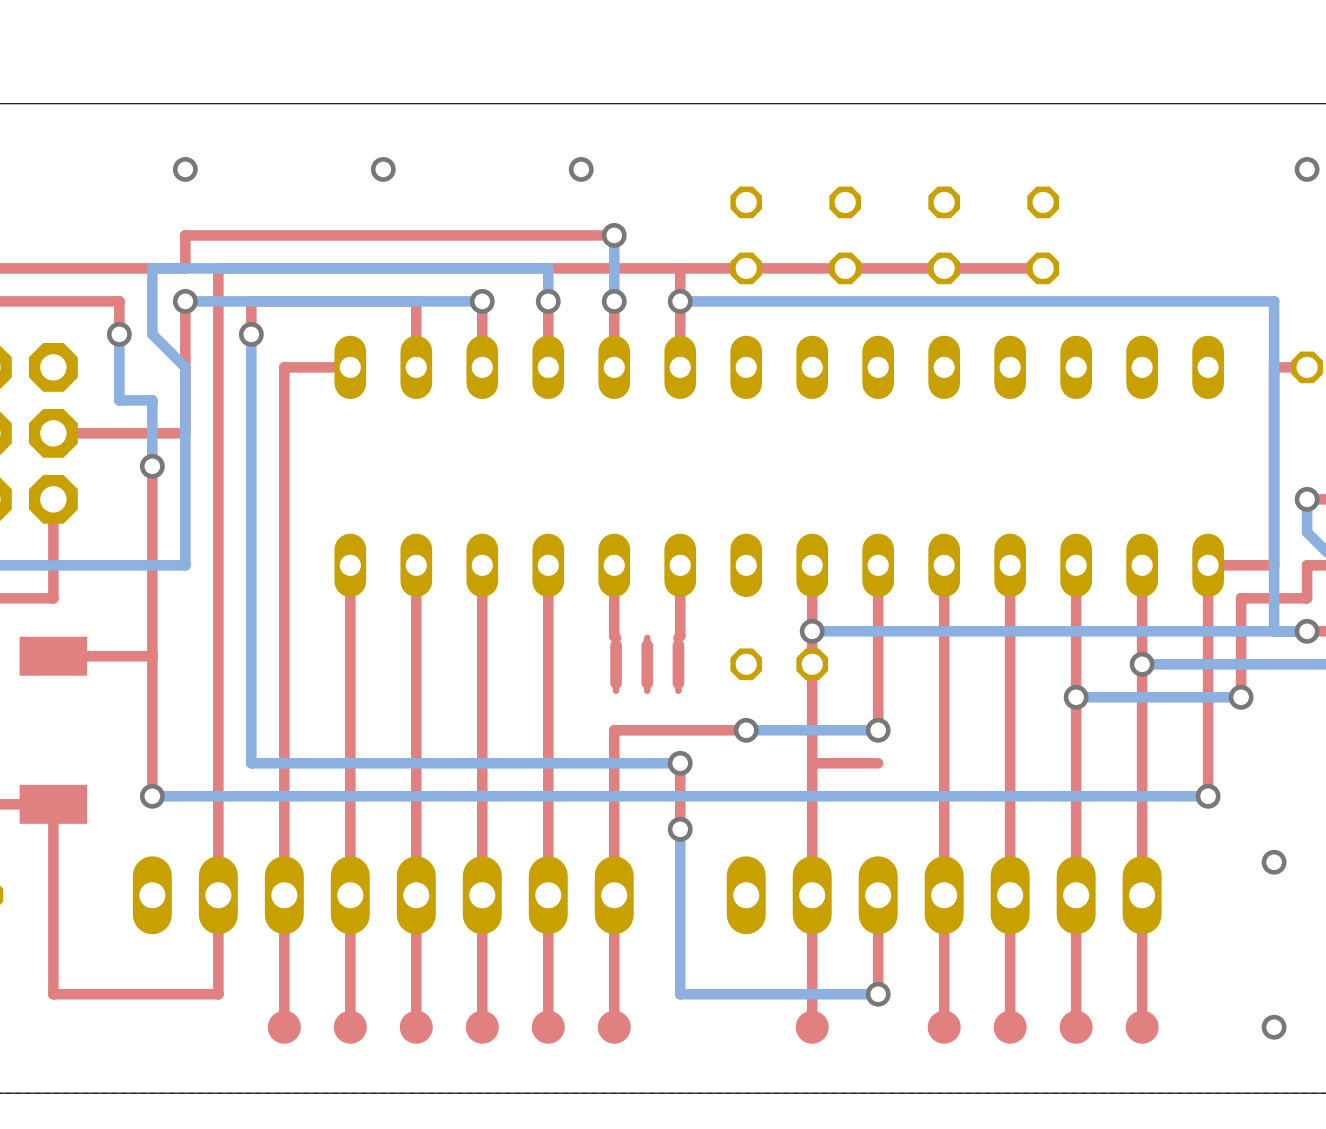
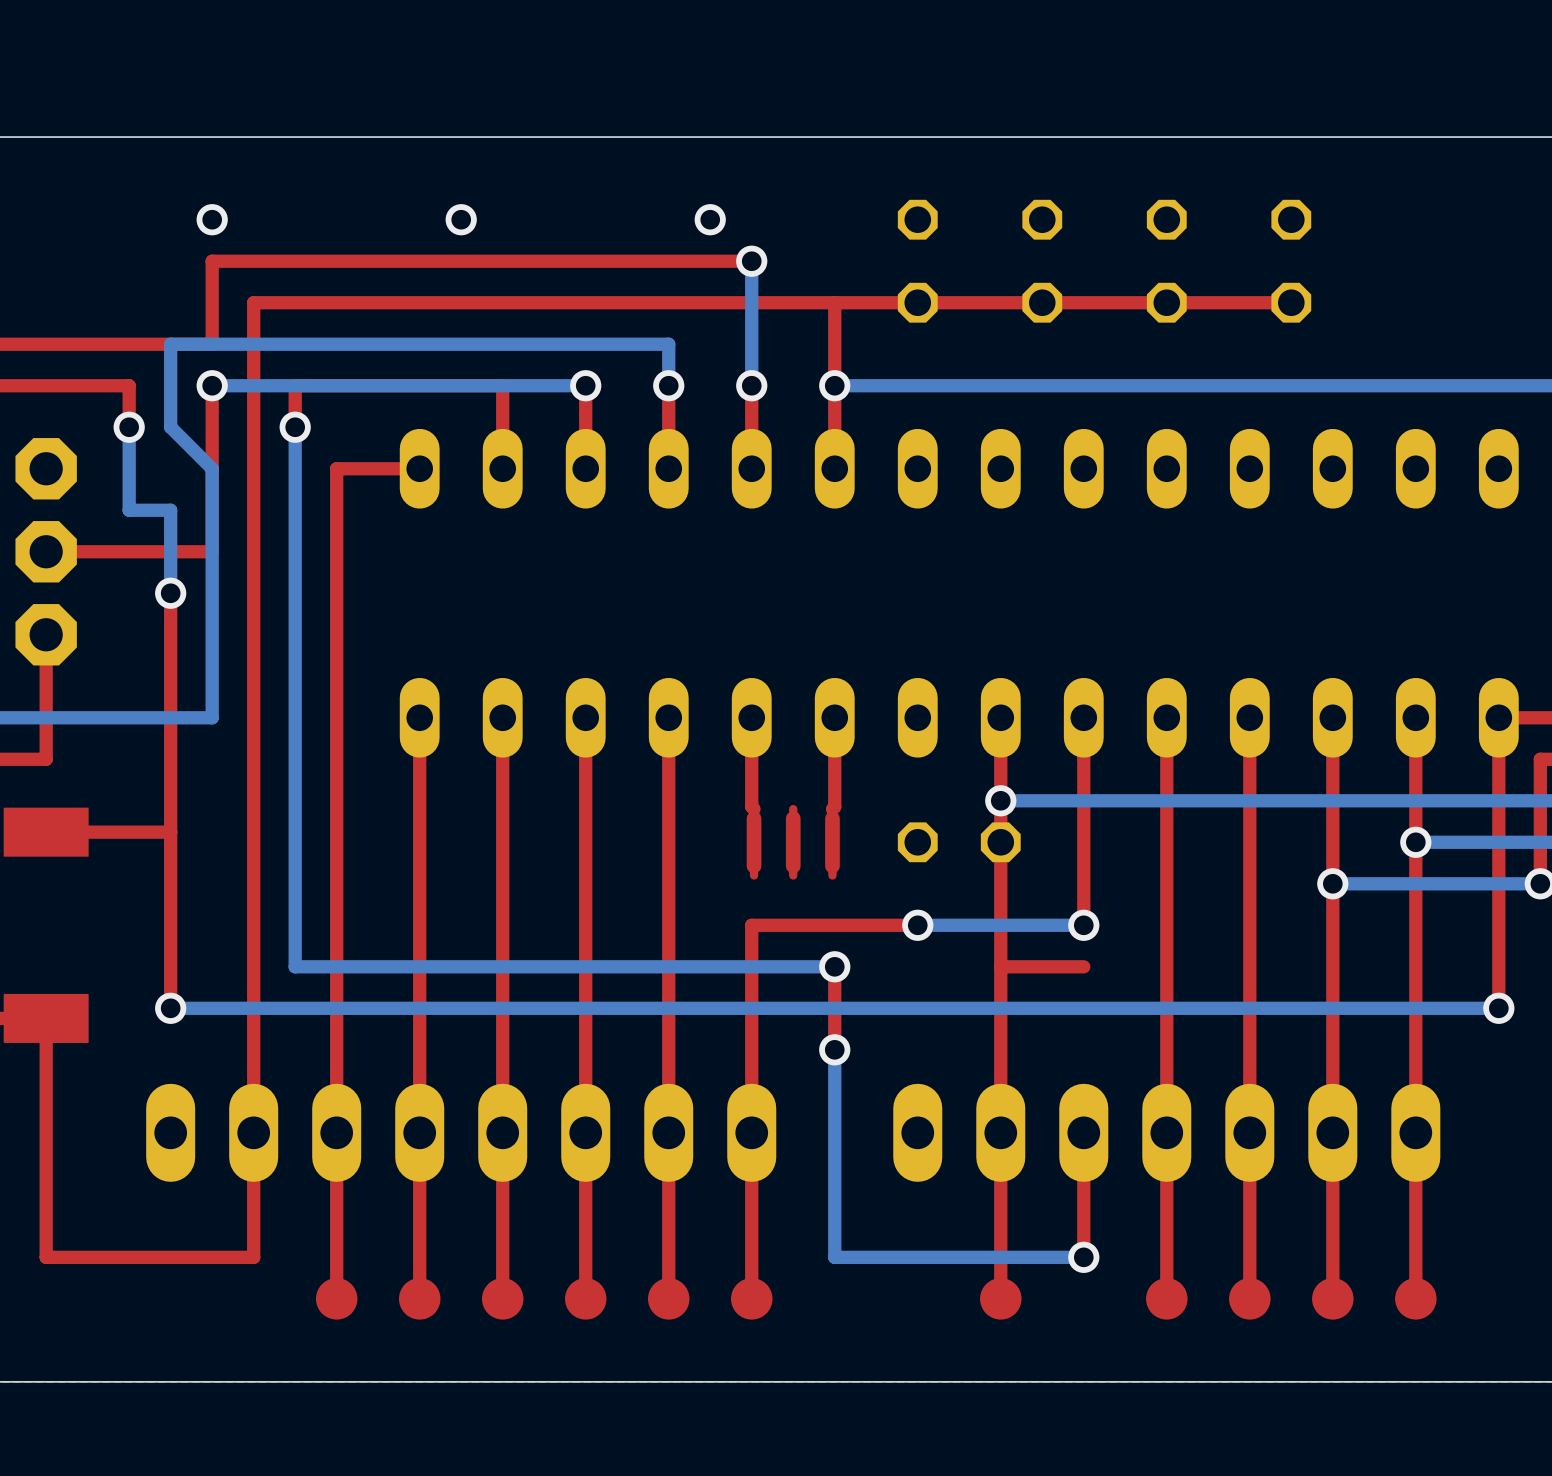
top track: none -> (751, 261) (212, 261) (212, 302)
bottom track: none -> (751, 261) (751, 302)
top track: (218, 235) (185, 235) -> (253, 302) (253, 344)
via position: (614, 235) -> (751, 261)
top track: none -> (834, 302) (834, 344)
part position: (746, 235) -> (917, 261)
part position: (845, 235) -> (1042, 261)
part position: (944, 235) -> (1166, 261)
top track: none -> (1291, 302) (751, 302)
part position: (1043, 235) -> (1291, 261)
top track: (1043, 268) (218, 268) -> none

